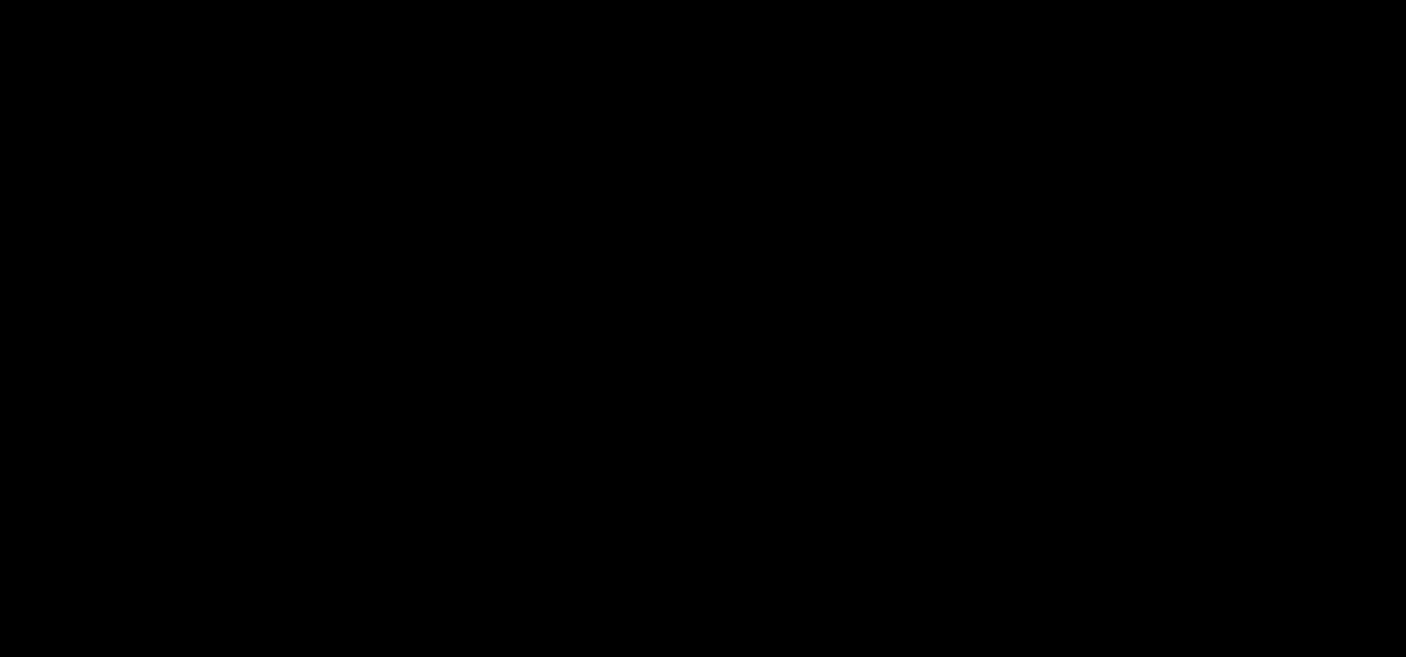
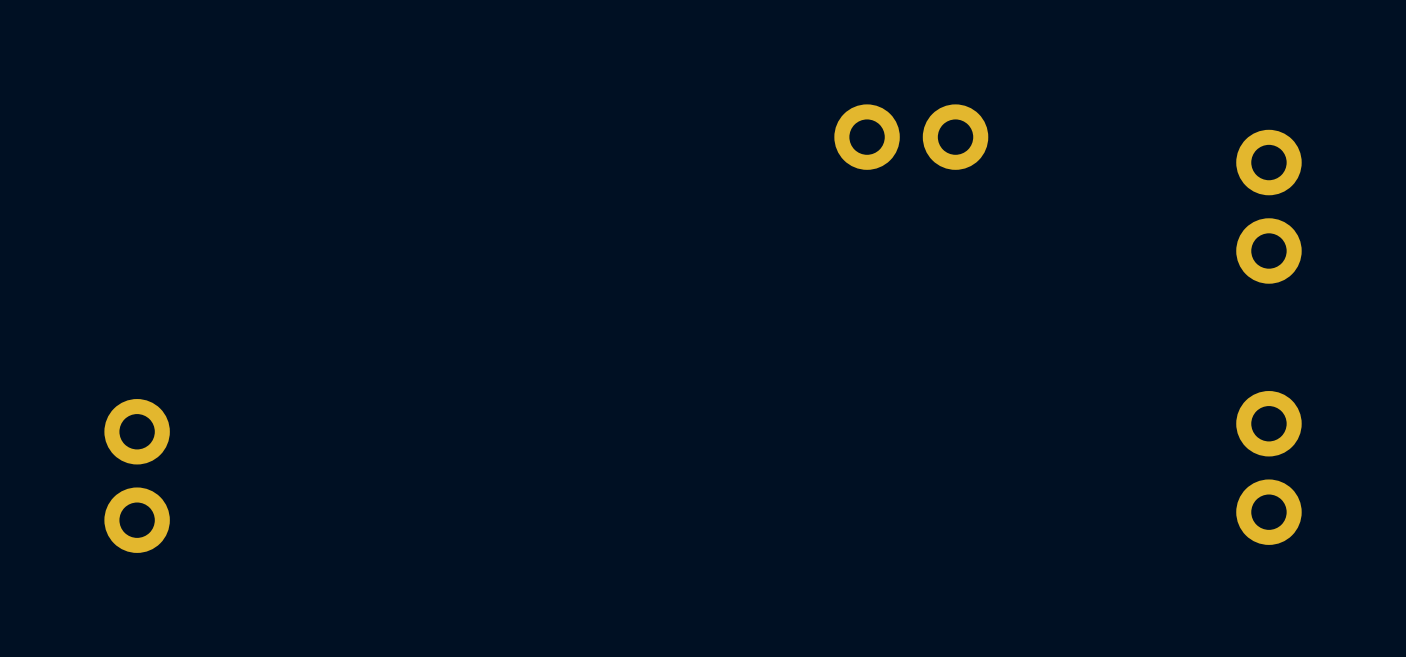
part: none -> (911, 137)
part: none -> (1268, 206)
part: none -> (1268, 467)
part: none -> (137, 475)

